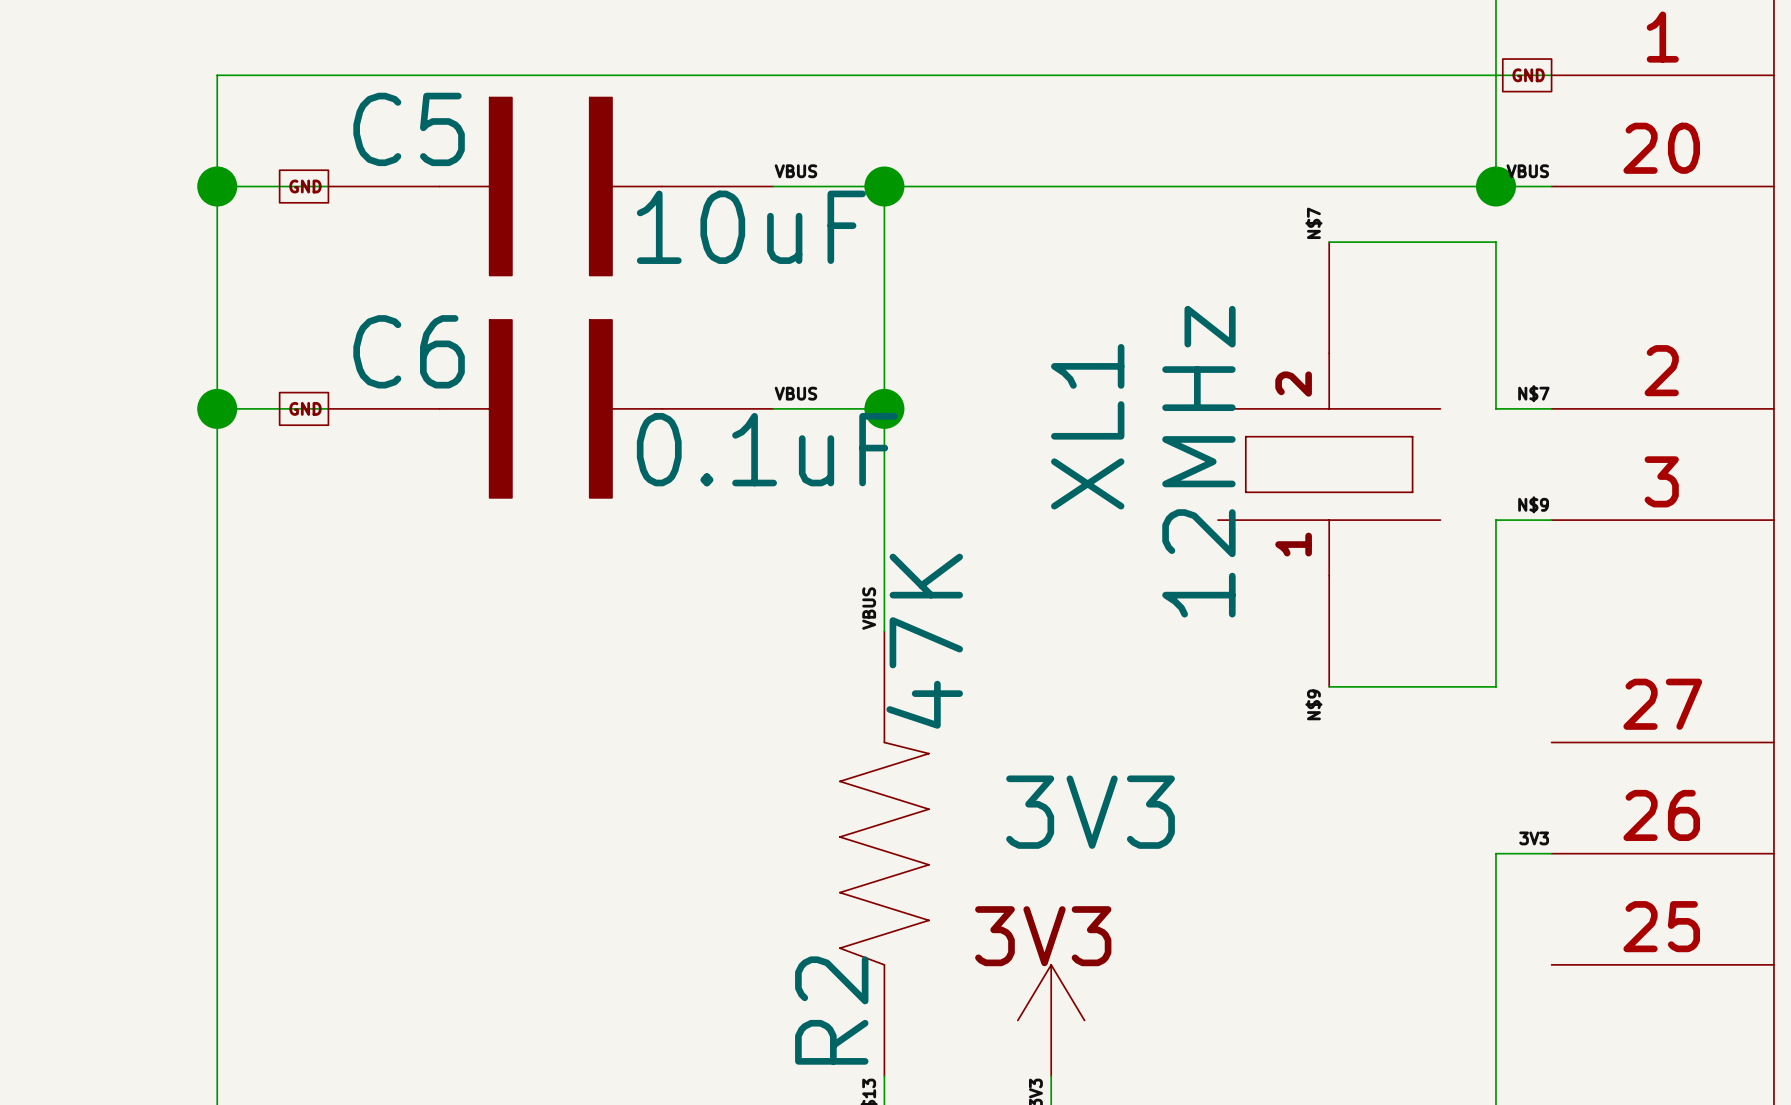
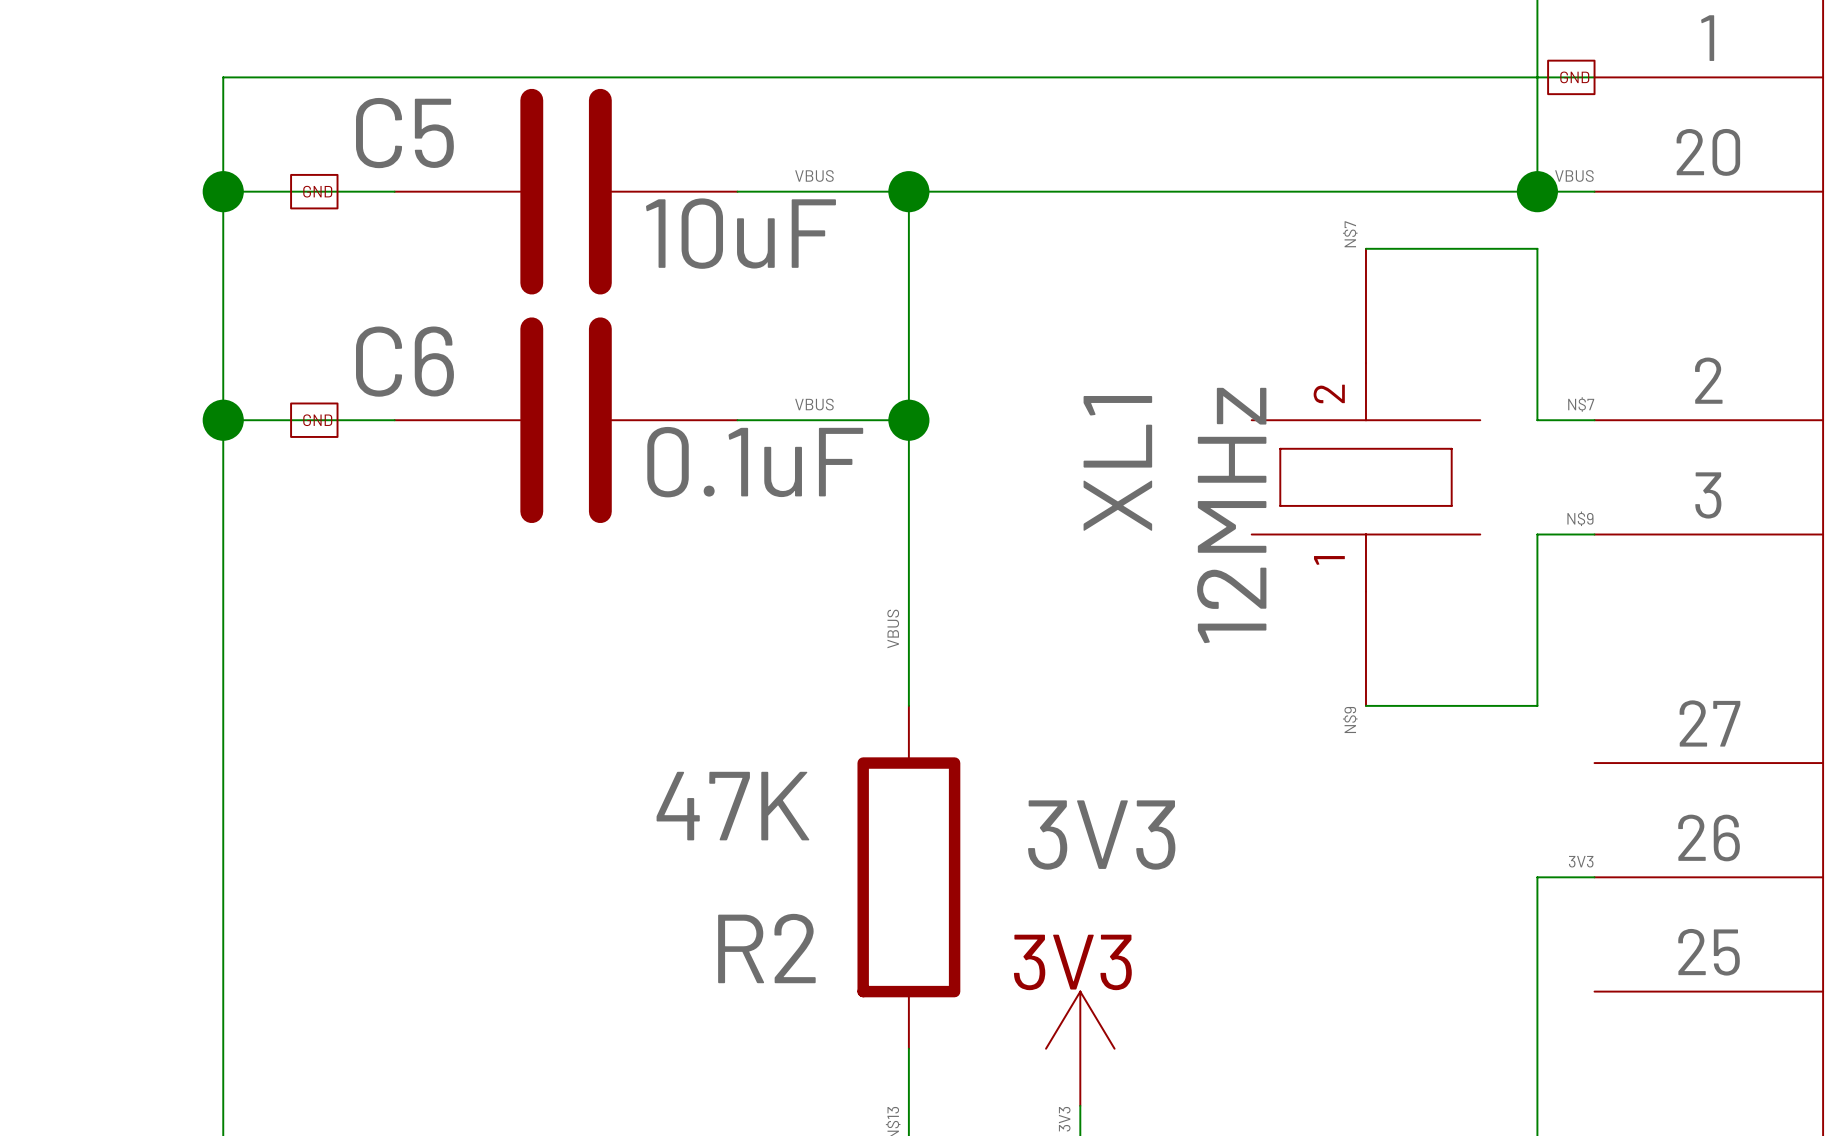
C5 symbol: [328, 97, 774, 276] -> [394, 88, 738, 295]
C6 symbol: [328, 319, 774, 498] -> [394, 317, 738, 524]
R2 symbol: [839, 631, 929, 1077] -> [857, 705, 961, 1049]
R2 value position: 47K (924, 641) -> 47K (732, 806)
R2 name position: R2 (831, 1010) -> R2 (766, 948)

